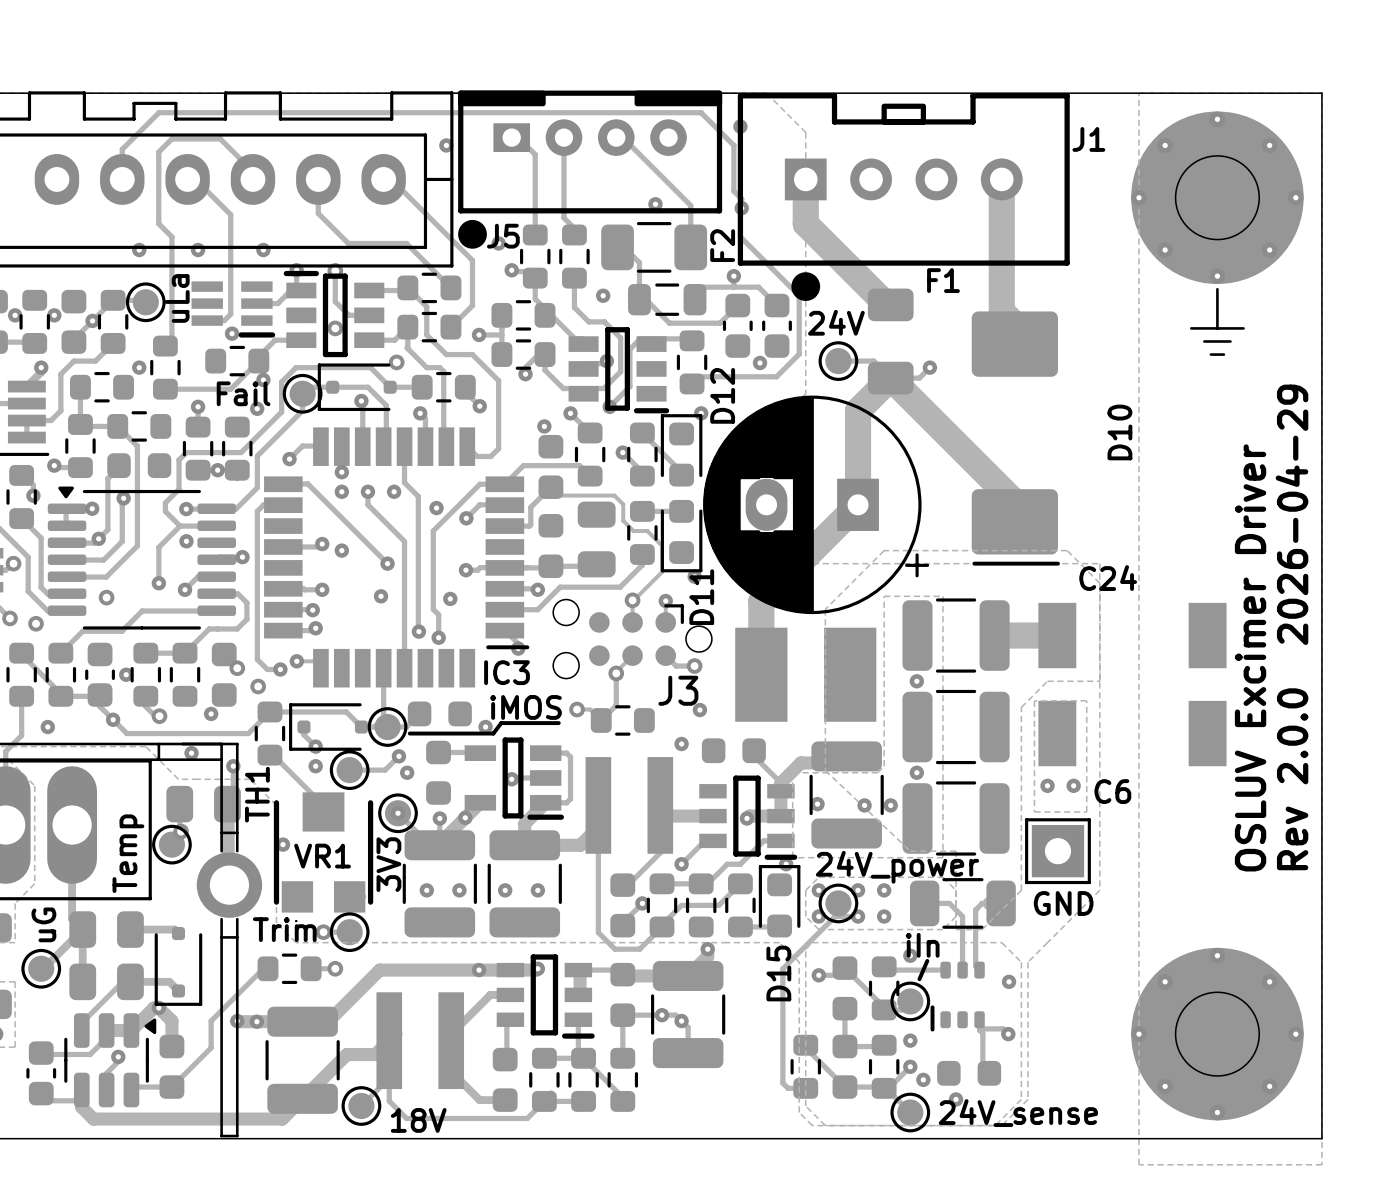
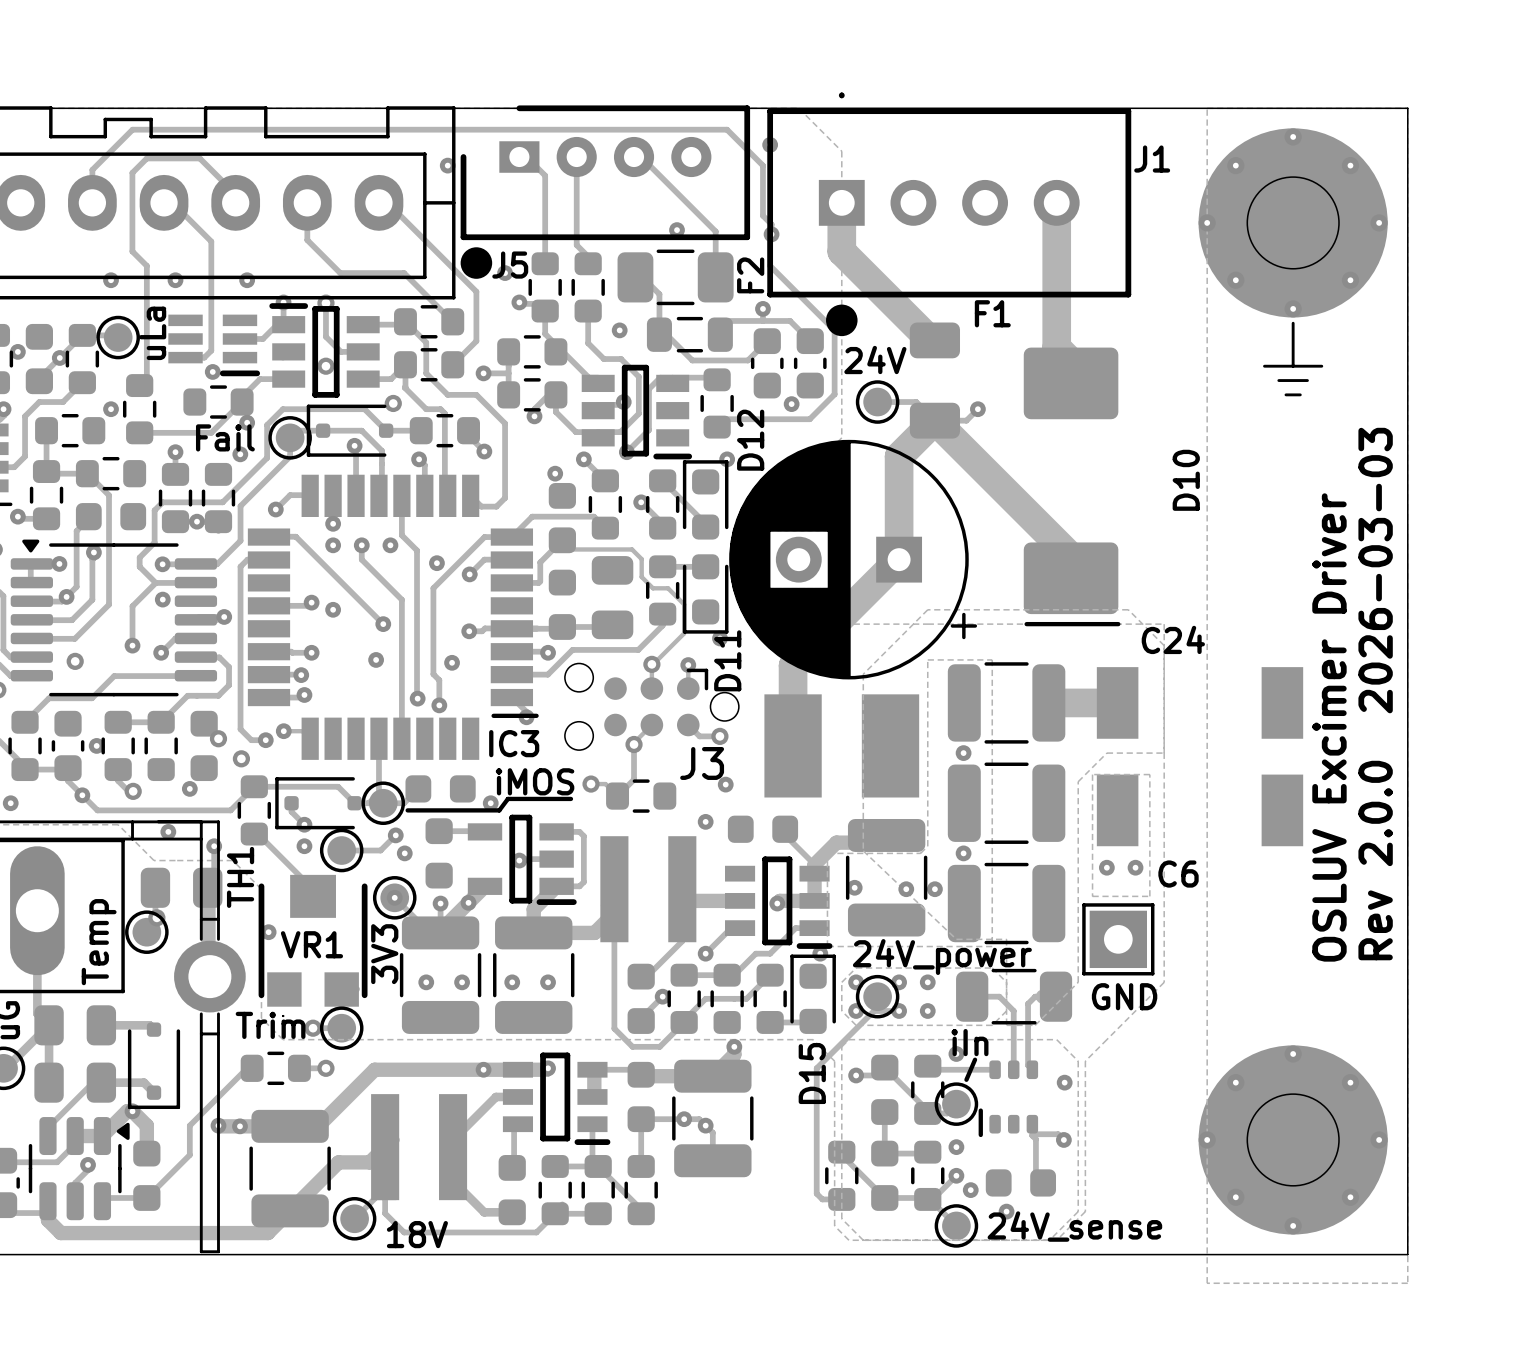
J5 footprint: [458, 90, 723, 214] -> [460, 105, 751, 241]
J1 footprint: [737, 93, 1070, 266] -> [767, 92, 1132, 298]
part footprint: [703, 395, 930, 615] -> [729, 439, 978, 680]
text: Rev 2.0.0 2026-04-29 (1292, 627) -> Rev 2.0.0 2026-03-03 (1375, 694)

